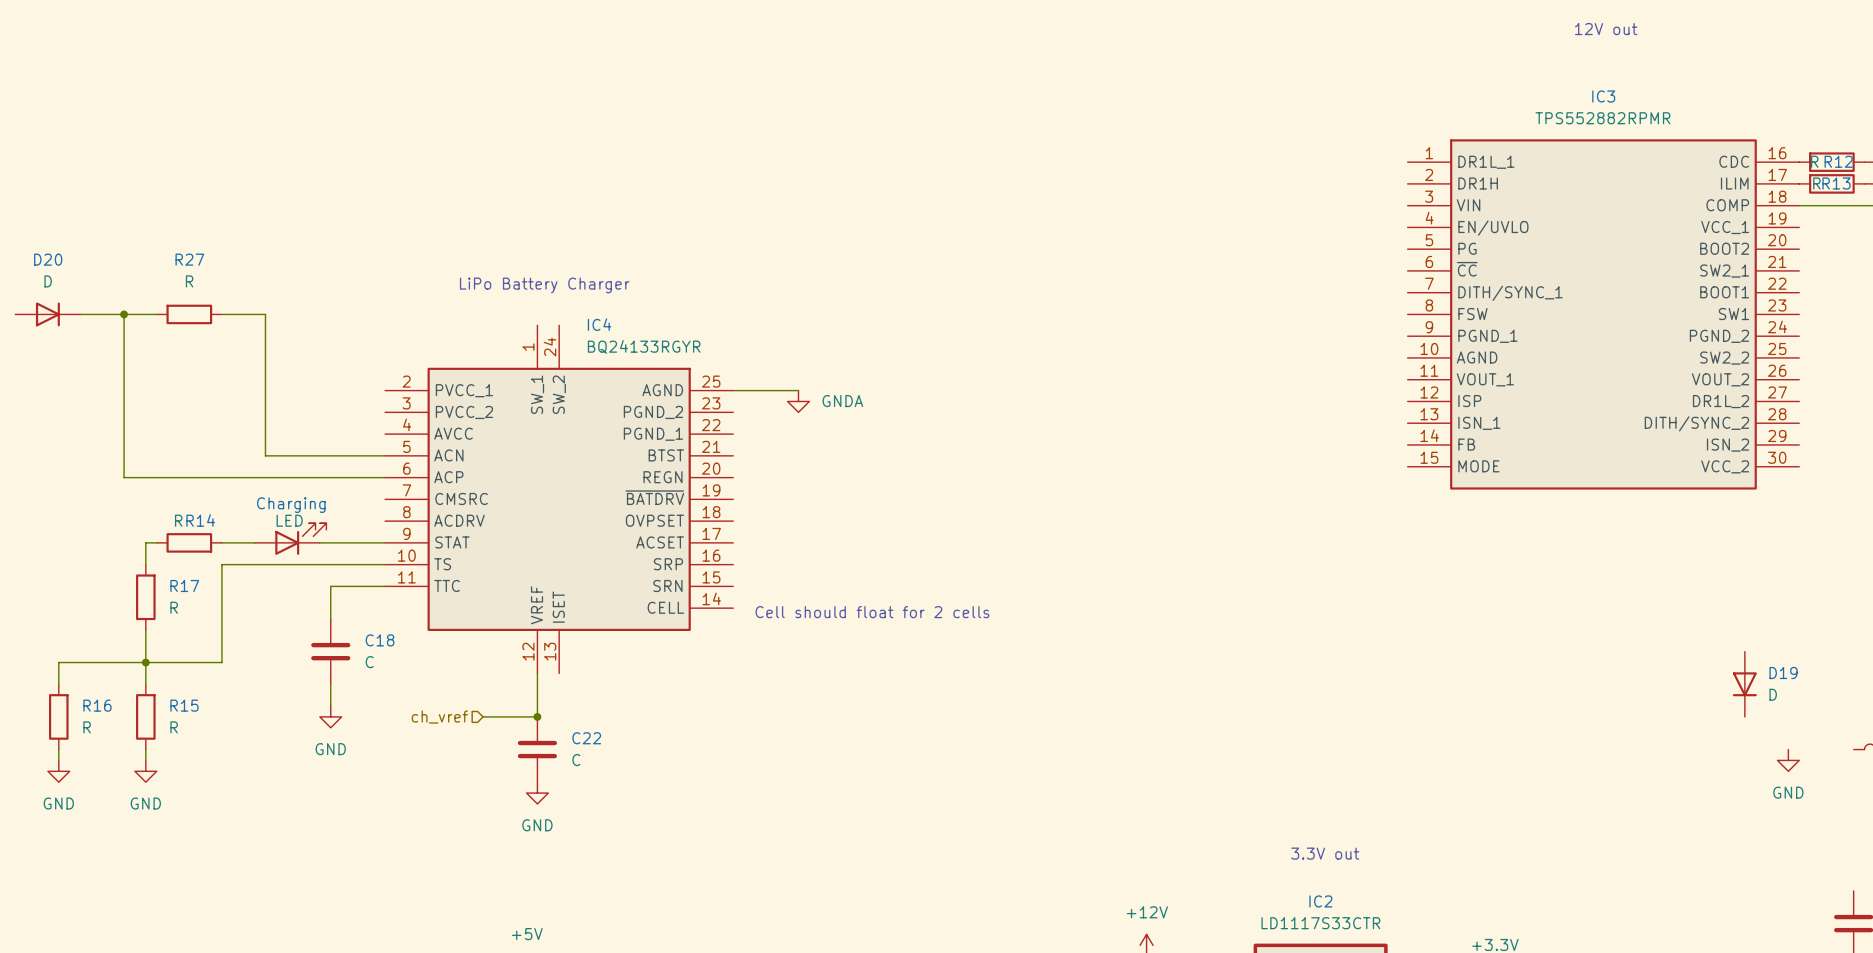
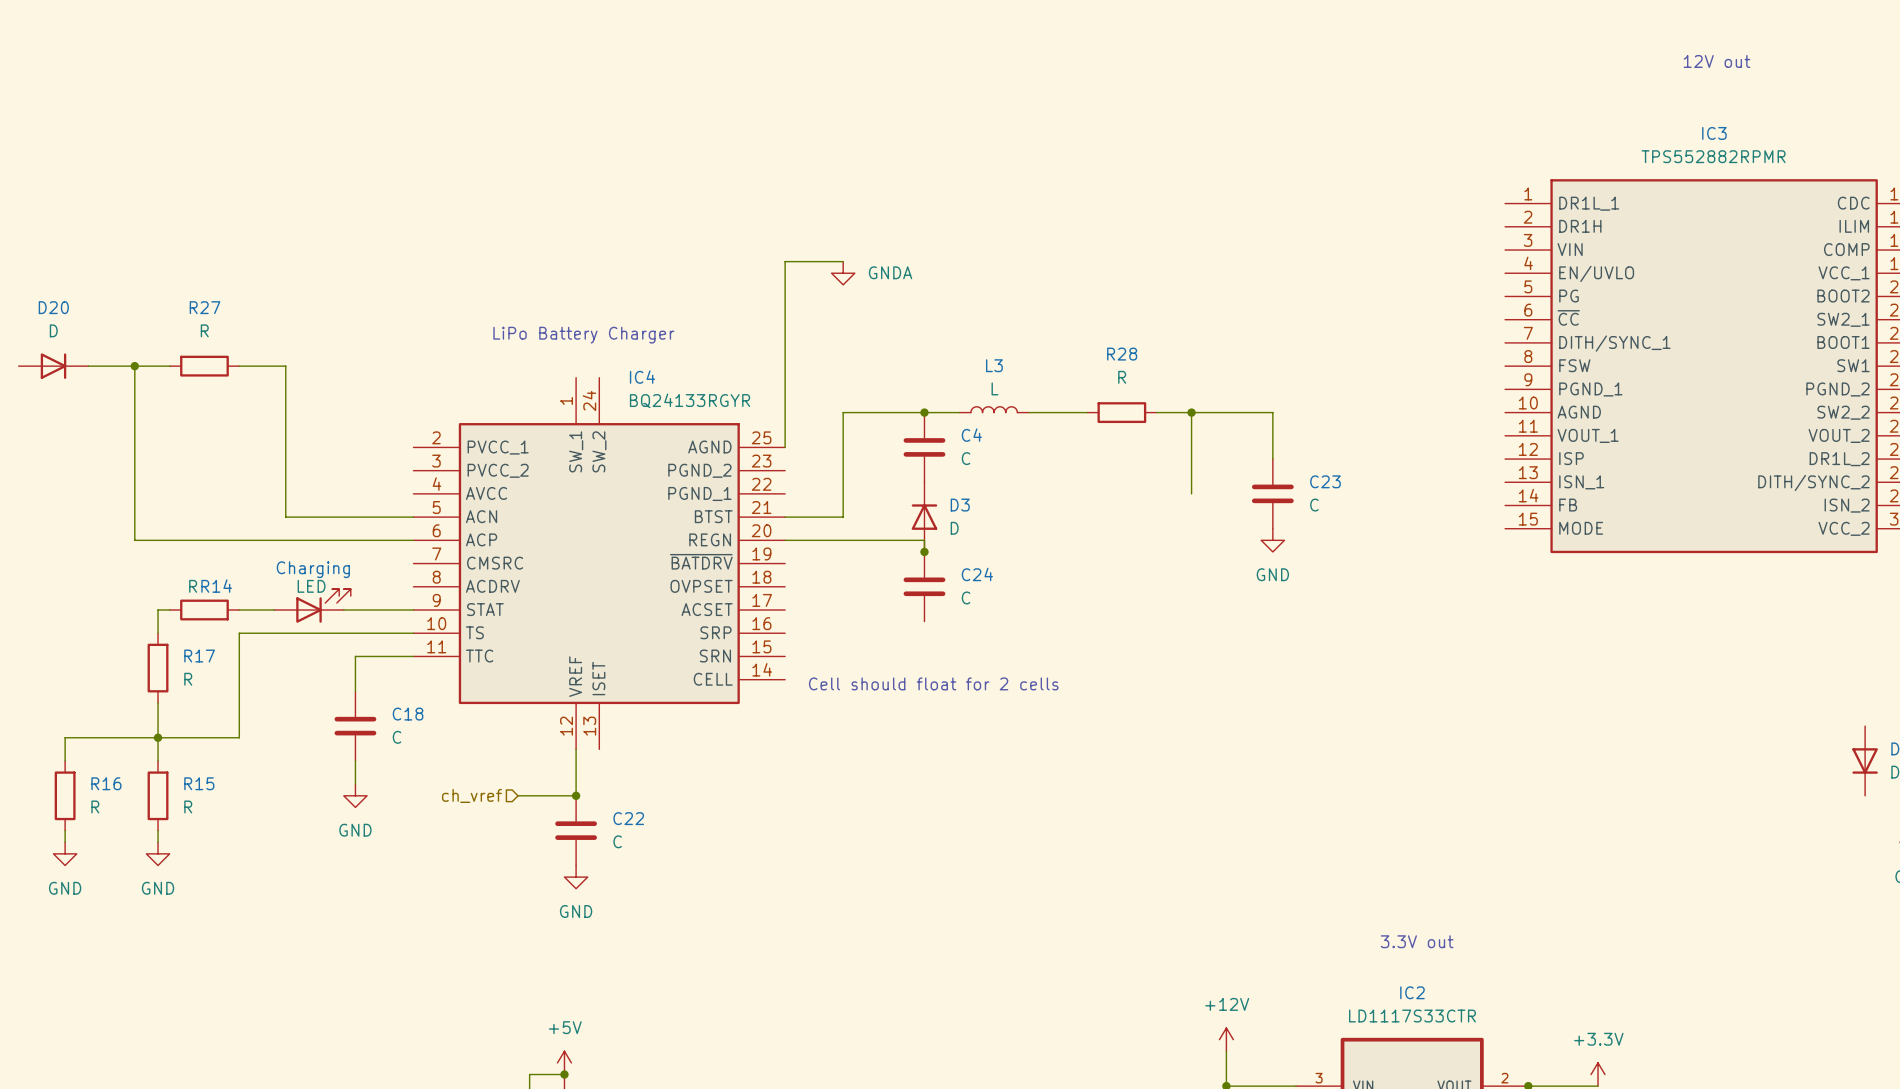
L3: none -> L (994, 409)
junction: none -> (924, 412)
wire: none -> (959, 412) (843, 412) (843, 517) (785, 517)
wire: none -> (1028, 412) (1087, 412)
R28: none -> R (1121, 412)
wire: none -> (1156, 412) (1272, 412) (1272, 459)
wire: none -> (1191, 412) (1191, 493)
junction: none -> (1191, 412)
wire: (733, 390) (798, 390) -> (785, 447) (785, 261) (843, 261)
C4: none -> C (924, 447)
power symbol position: GNDA (798, 401) -> GNDA (843, 273)
C23: none -> C (1272, 493)
D3: none -> D (924, 517)
wire: none -> (785, 540) (924, 540) (924, 551)
power symbol: none -> GND (1272, 540)
junction: none -> (924, 551)
C24: none -> C (924, 586)

